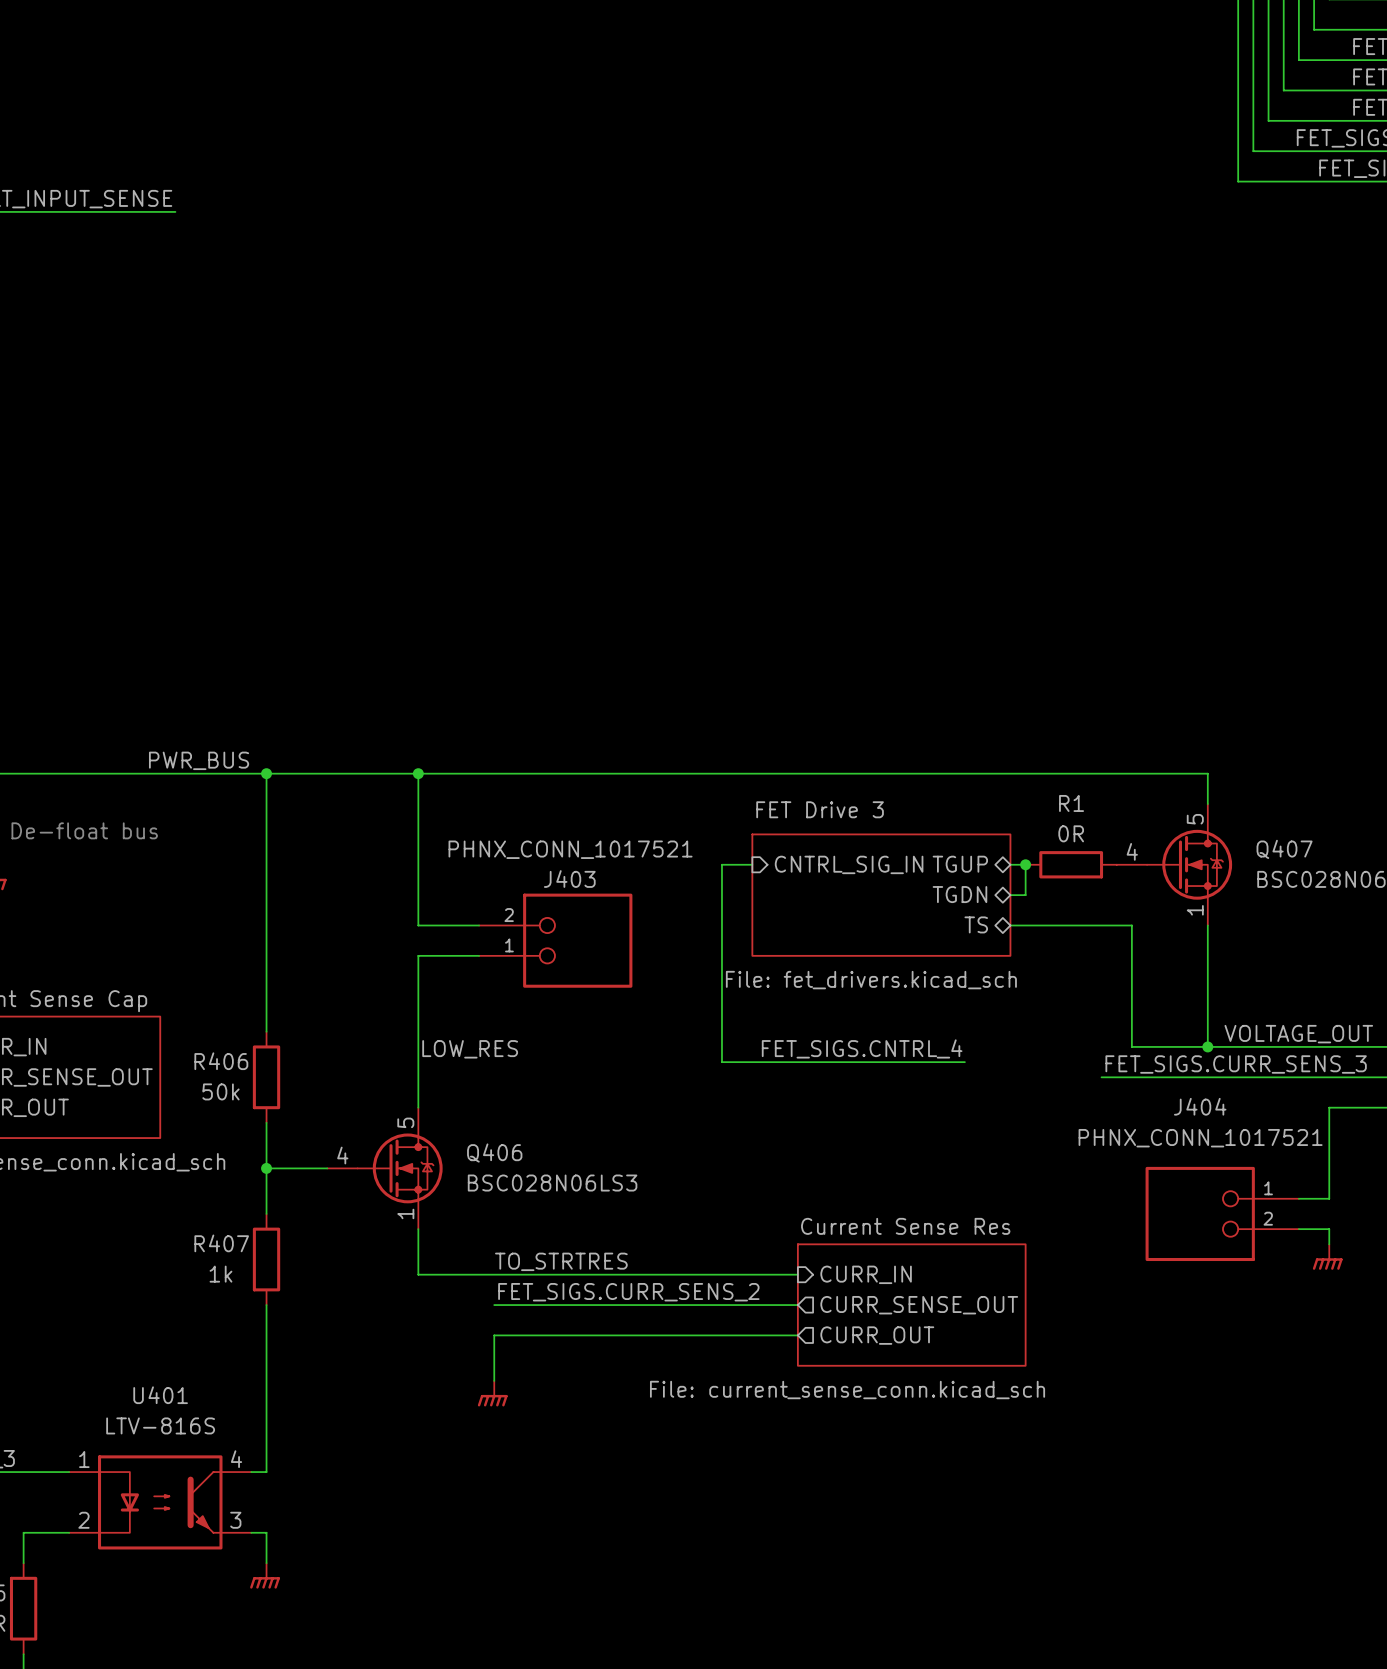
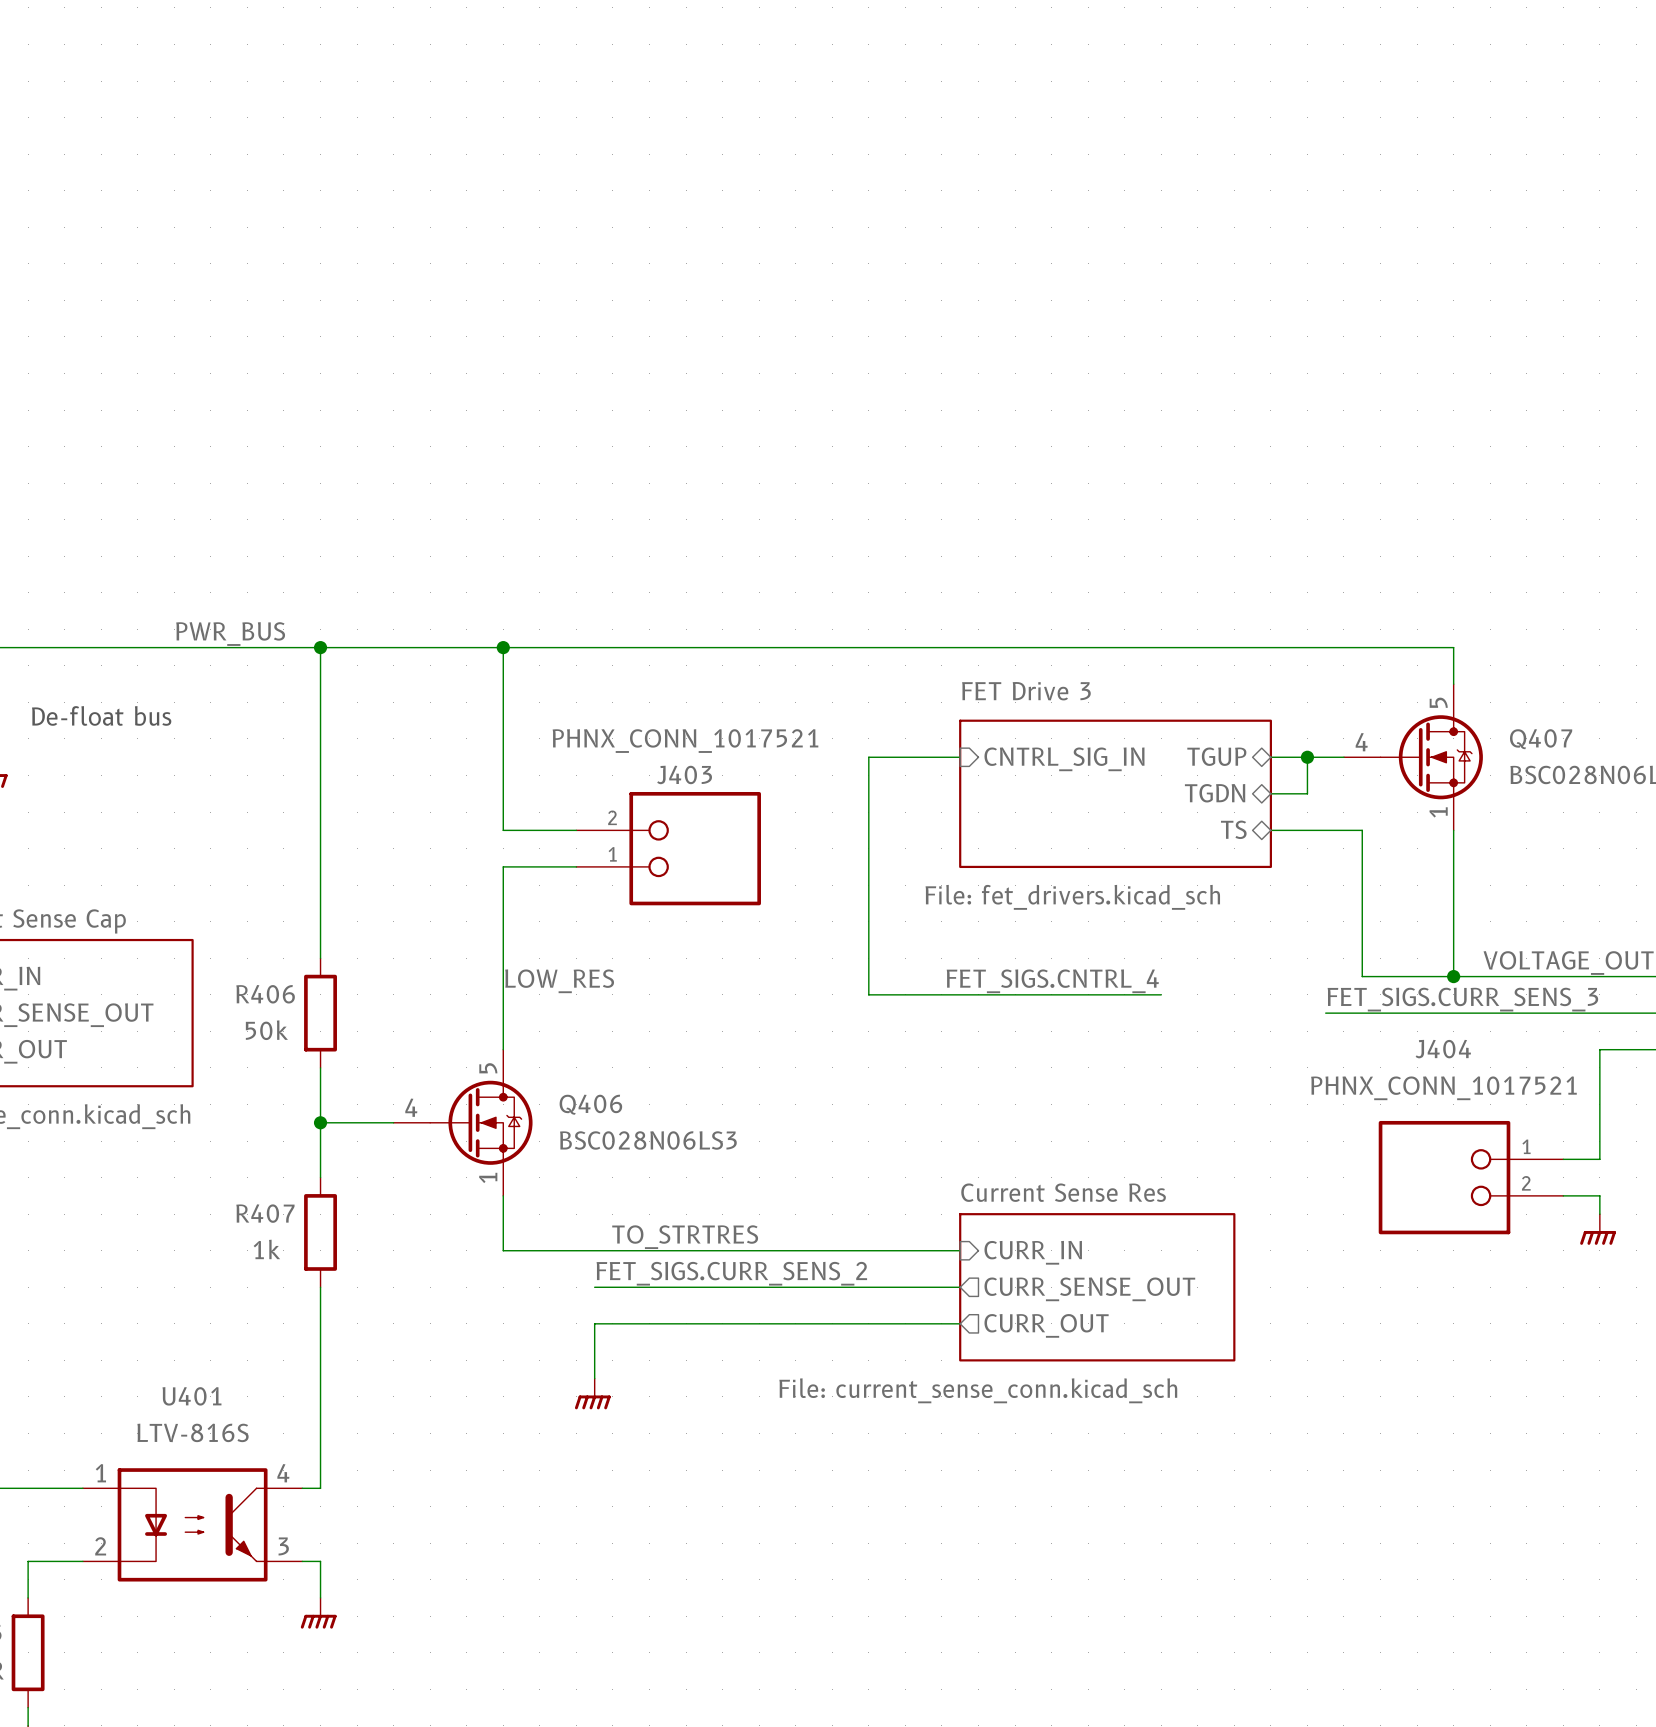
sheet pin position: CNTRL_SIG_IN (849, 864) -> CNTRL_SIG_IN (1064, 759)
sheet pin position: TGUP (960, 864) -> TGUP (1216, 756)
wire: (1010, 864) (1025, 864) (1025, 895) (1010, 895) -> none
junction position: (1025, 864) -> (1307, 757)
wire: none -> (1270, 757) (1343, 757)
R1: 0R (1071, 864) -> none
wire: none -> (1307, 757) (1307, 793) (1270, 793)
sheet pin position: TGDN (959, 894) -> TGDN (1215, 793)
sheet FET Drive 3 position: (881, 895) -> (1115, 793)
sheet pin position: TS (976, 924) -> TS (1233, 829)
wire: (1010, 925) (1055, 925) -> (905, 757) (960, 757)

